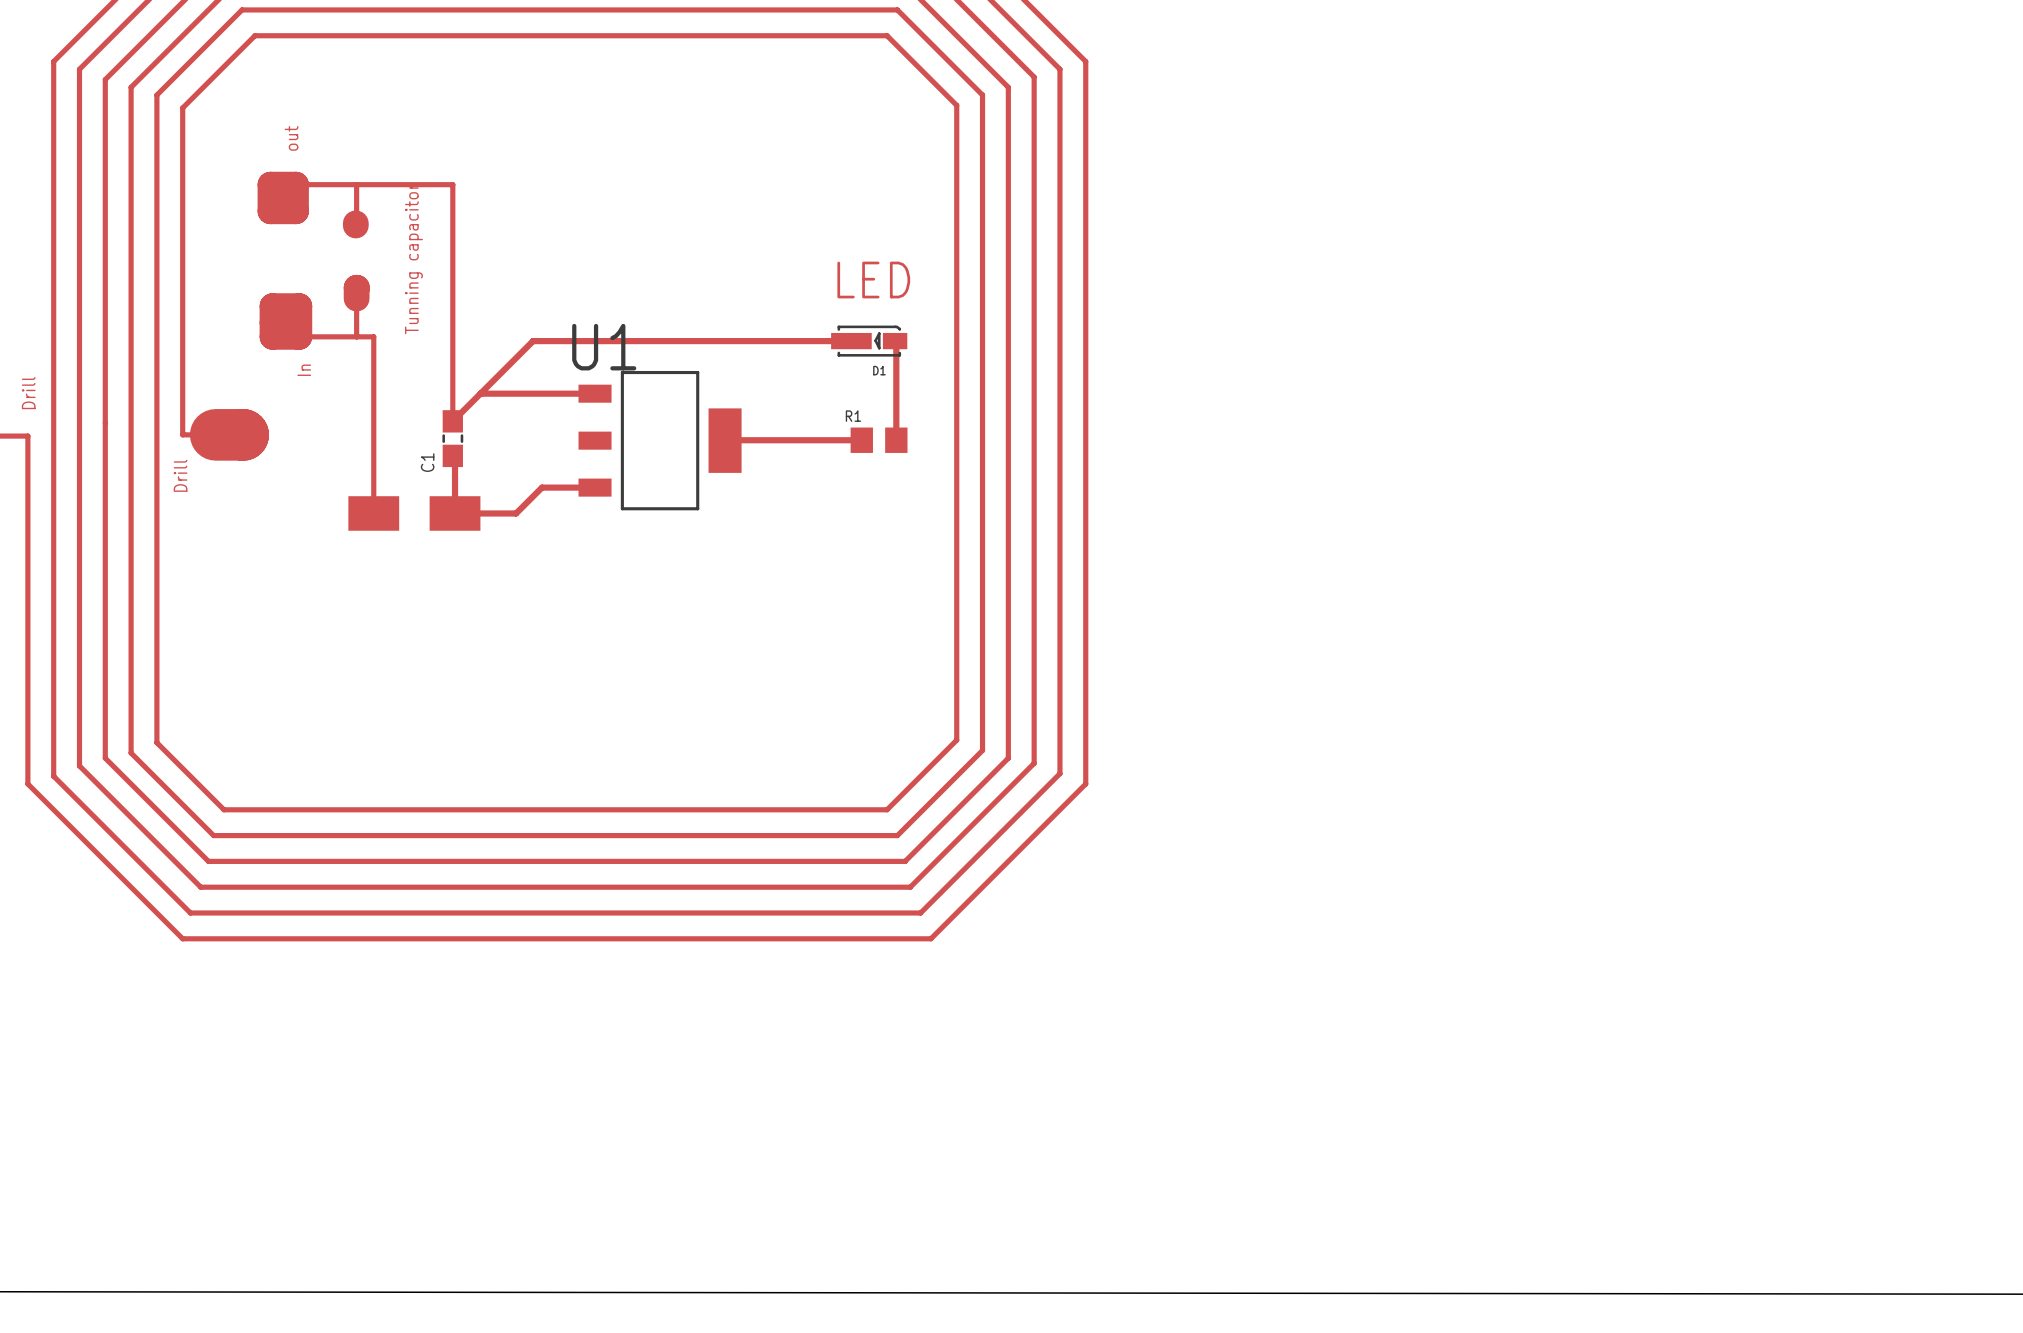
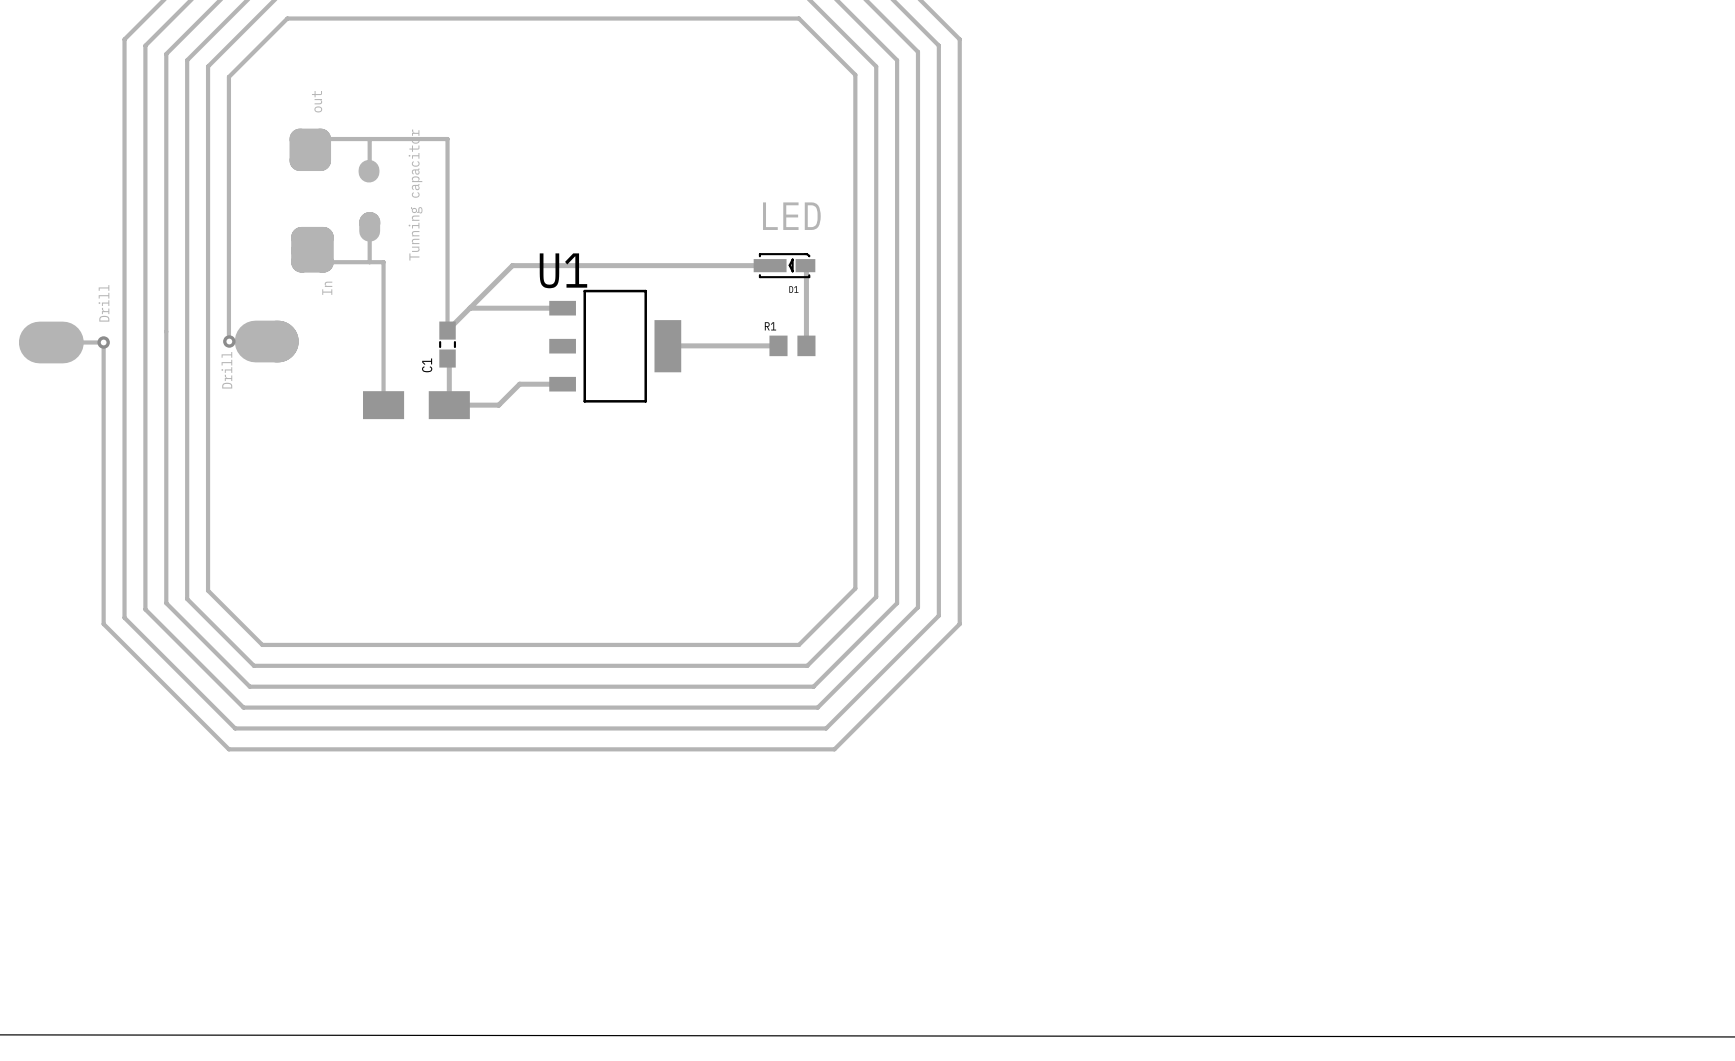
via: none -> (229, 341)
via: none -> (103, 342)

